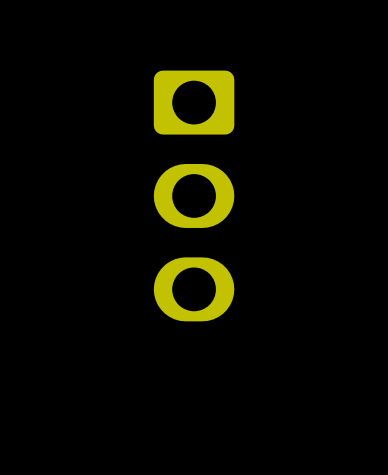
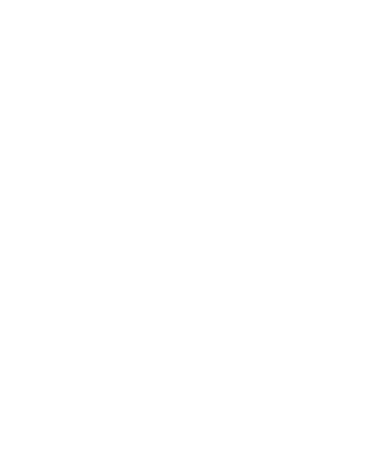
part: (194, 195) -> none

